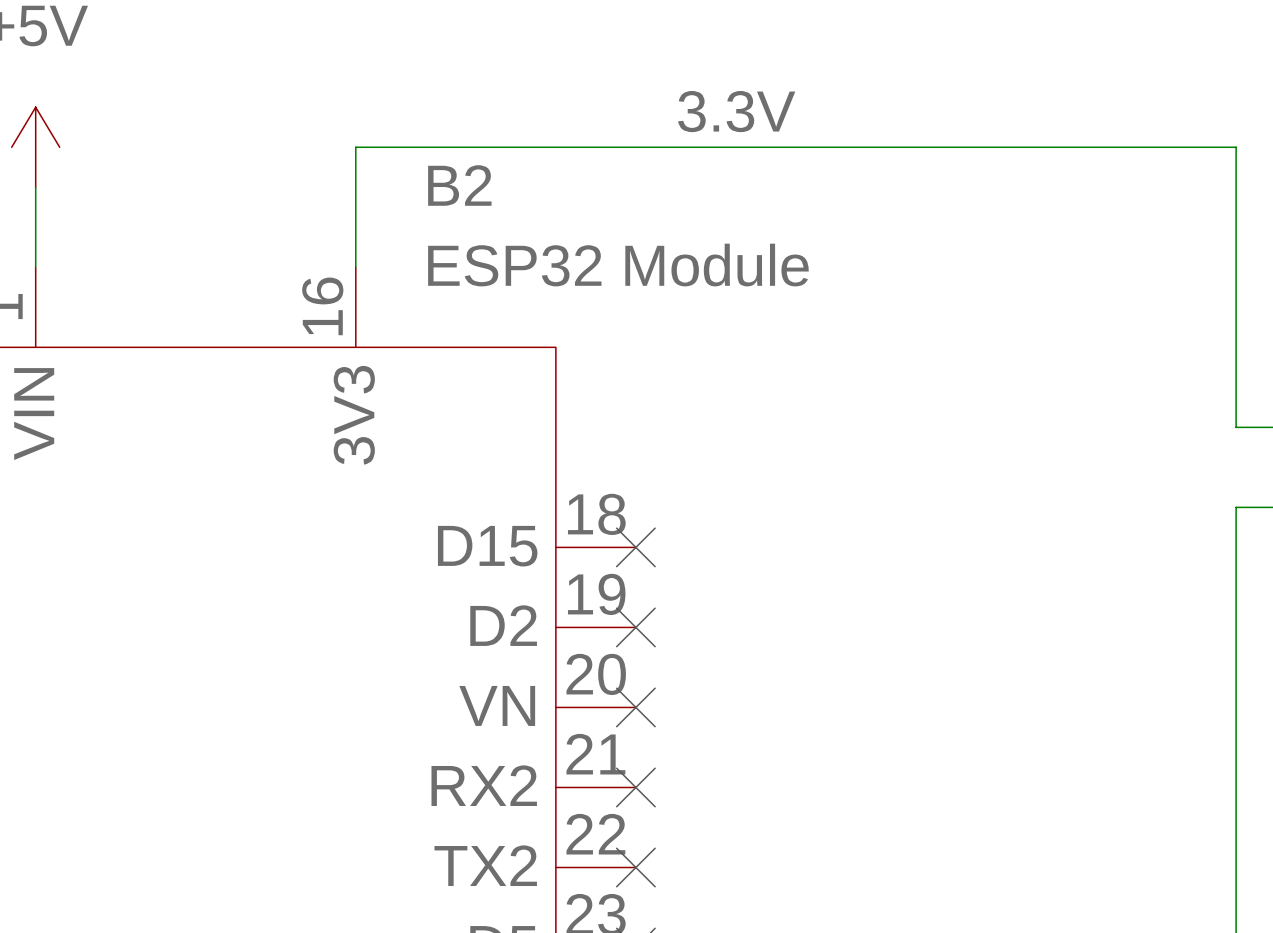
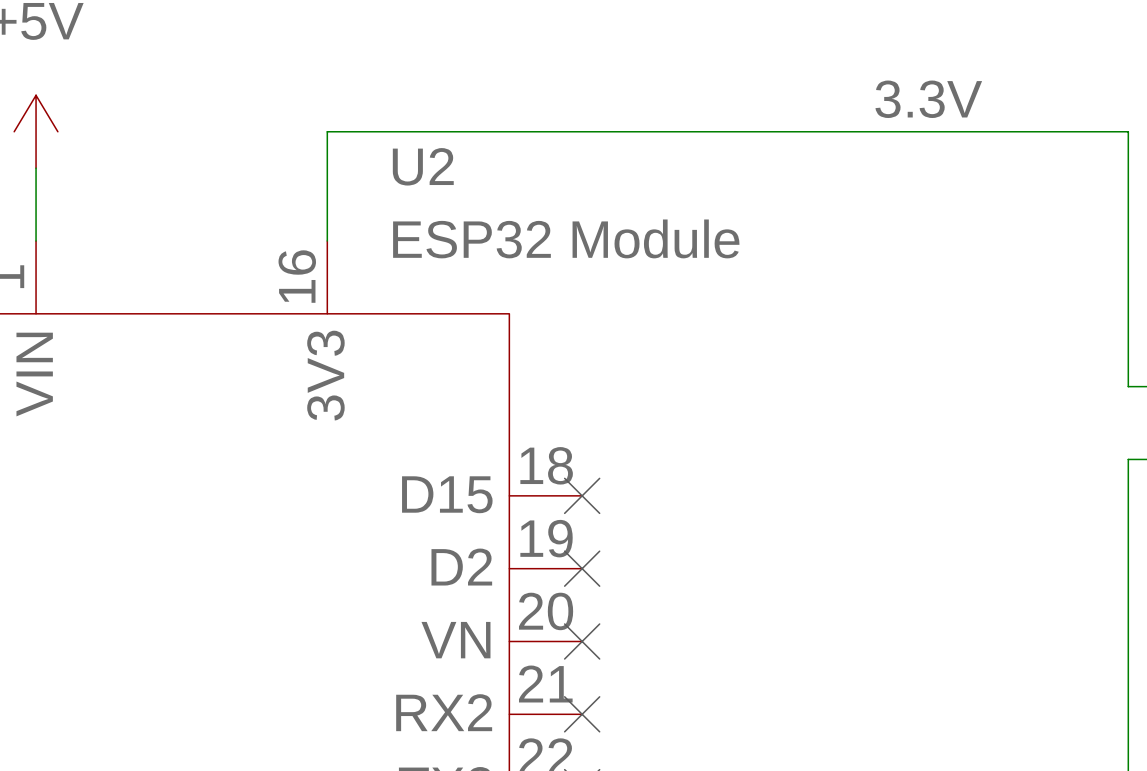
label position: 3.3V (736, 111) -> 3.3V (928, 99)
B2 name: B2 (459, 185) -> U2 (423, 166)

